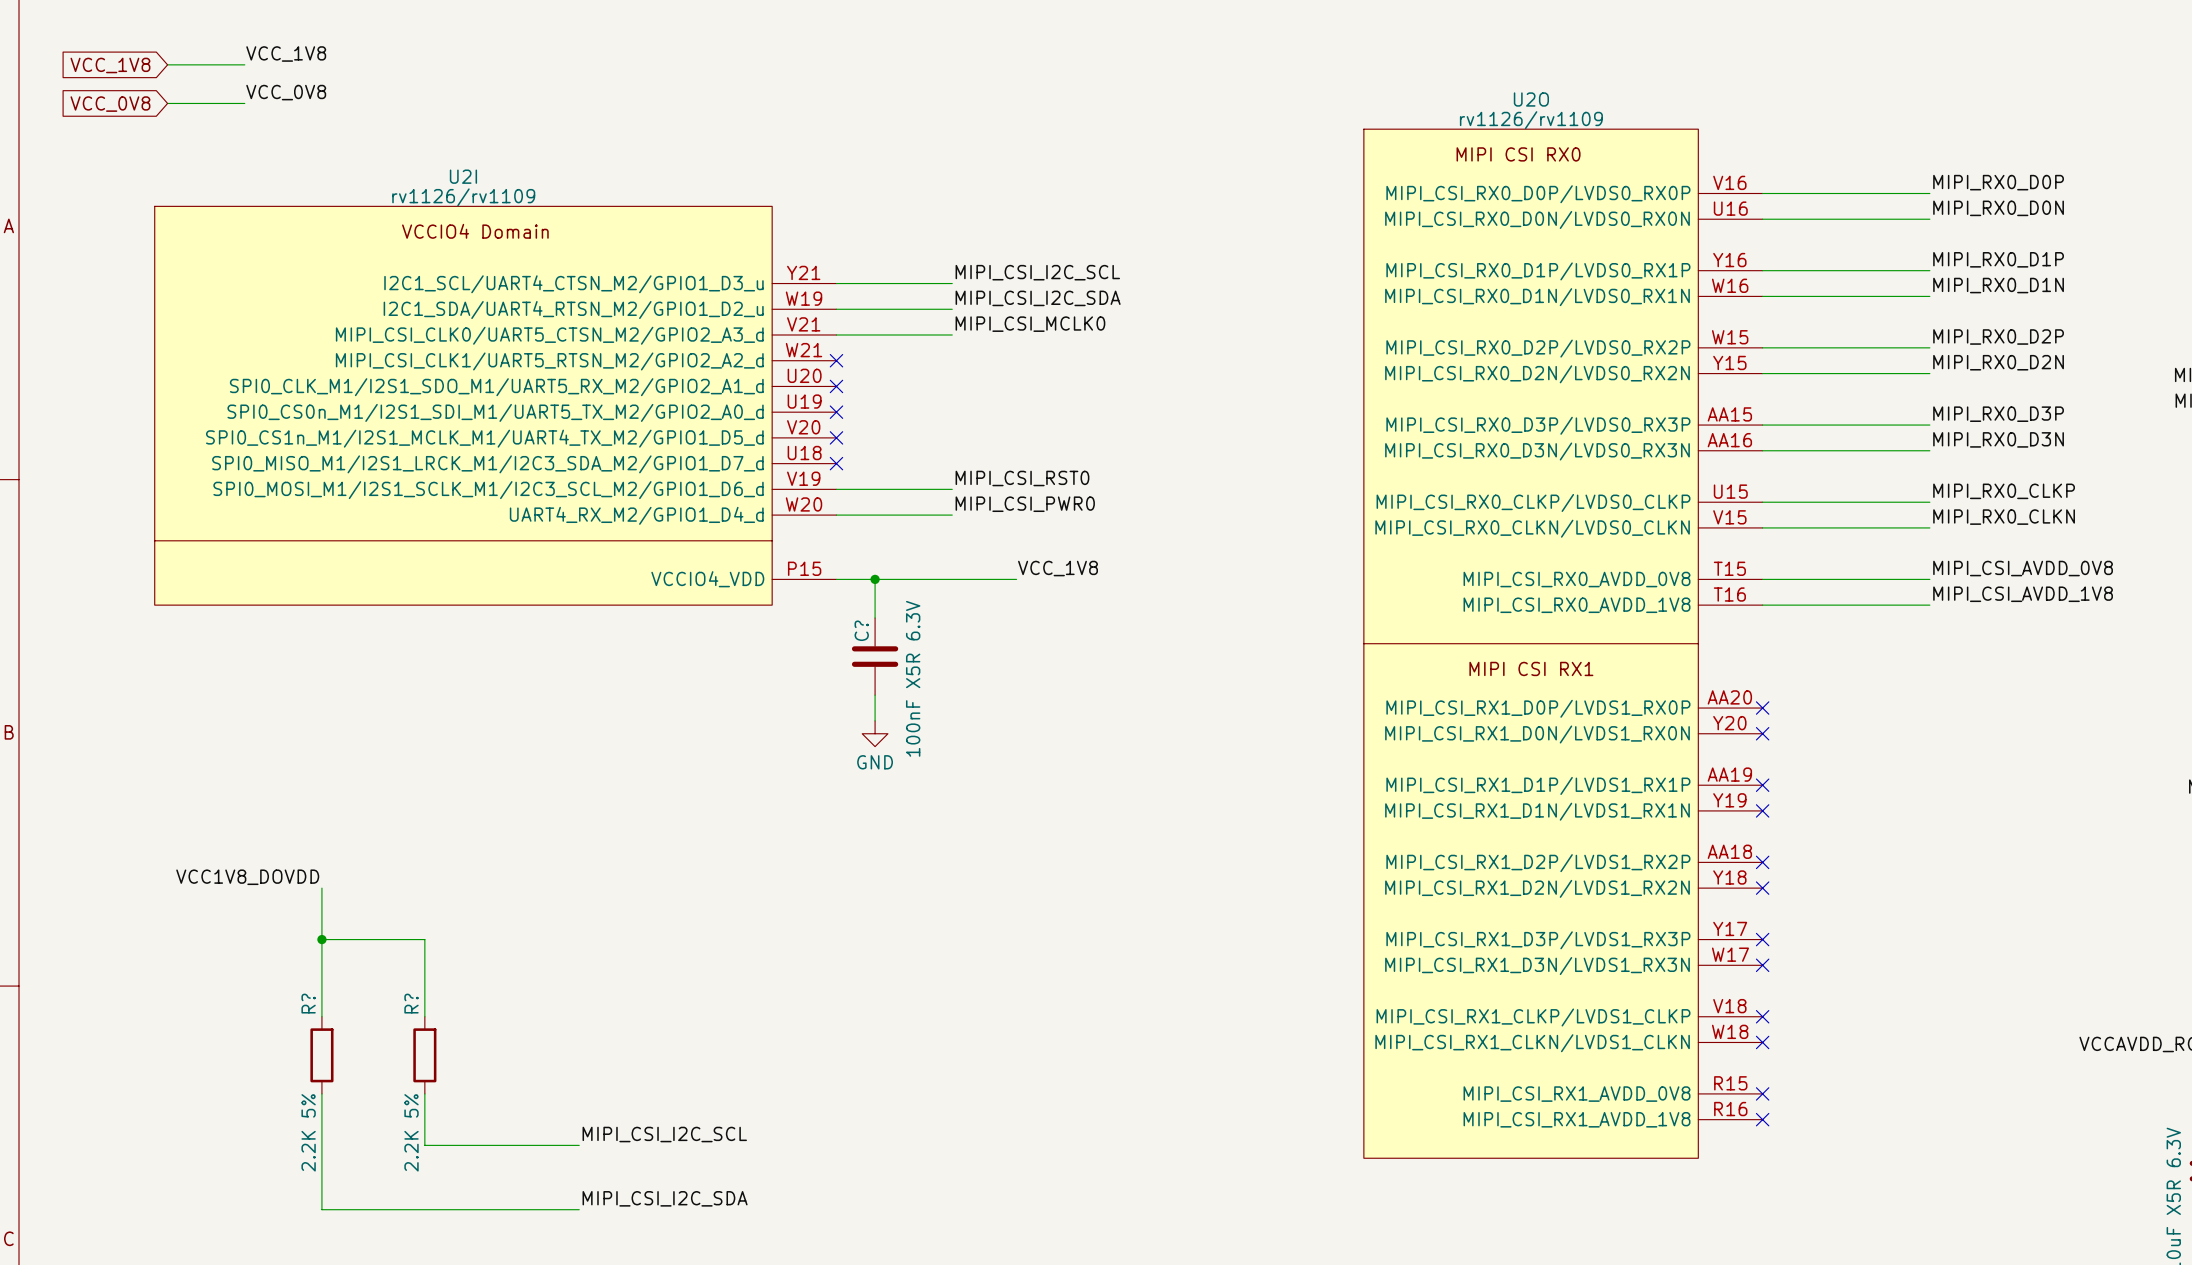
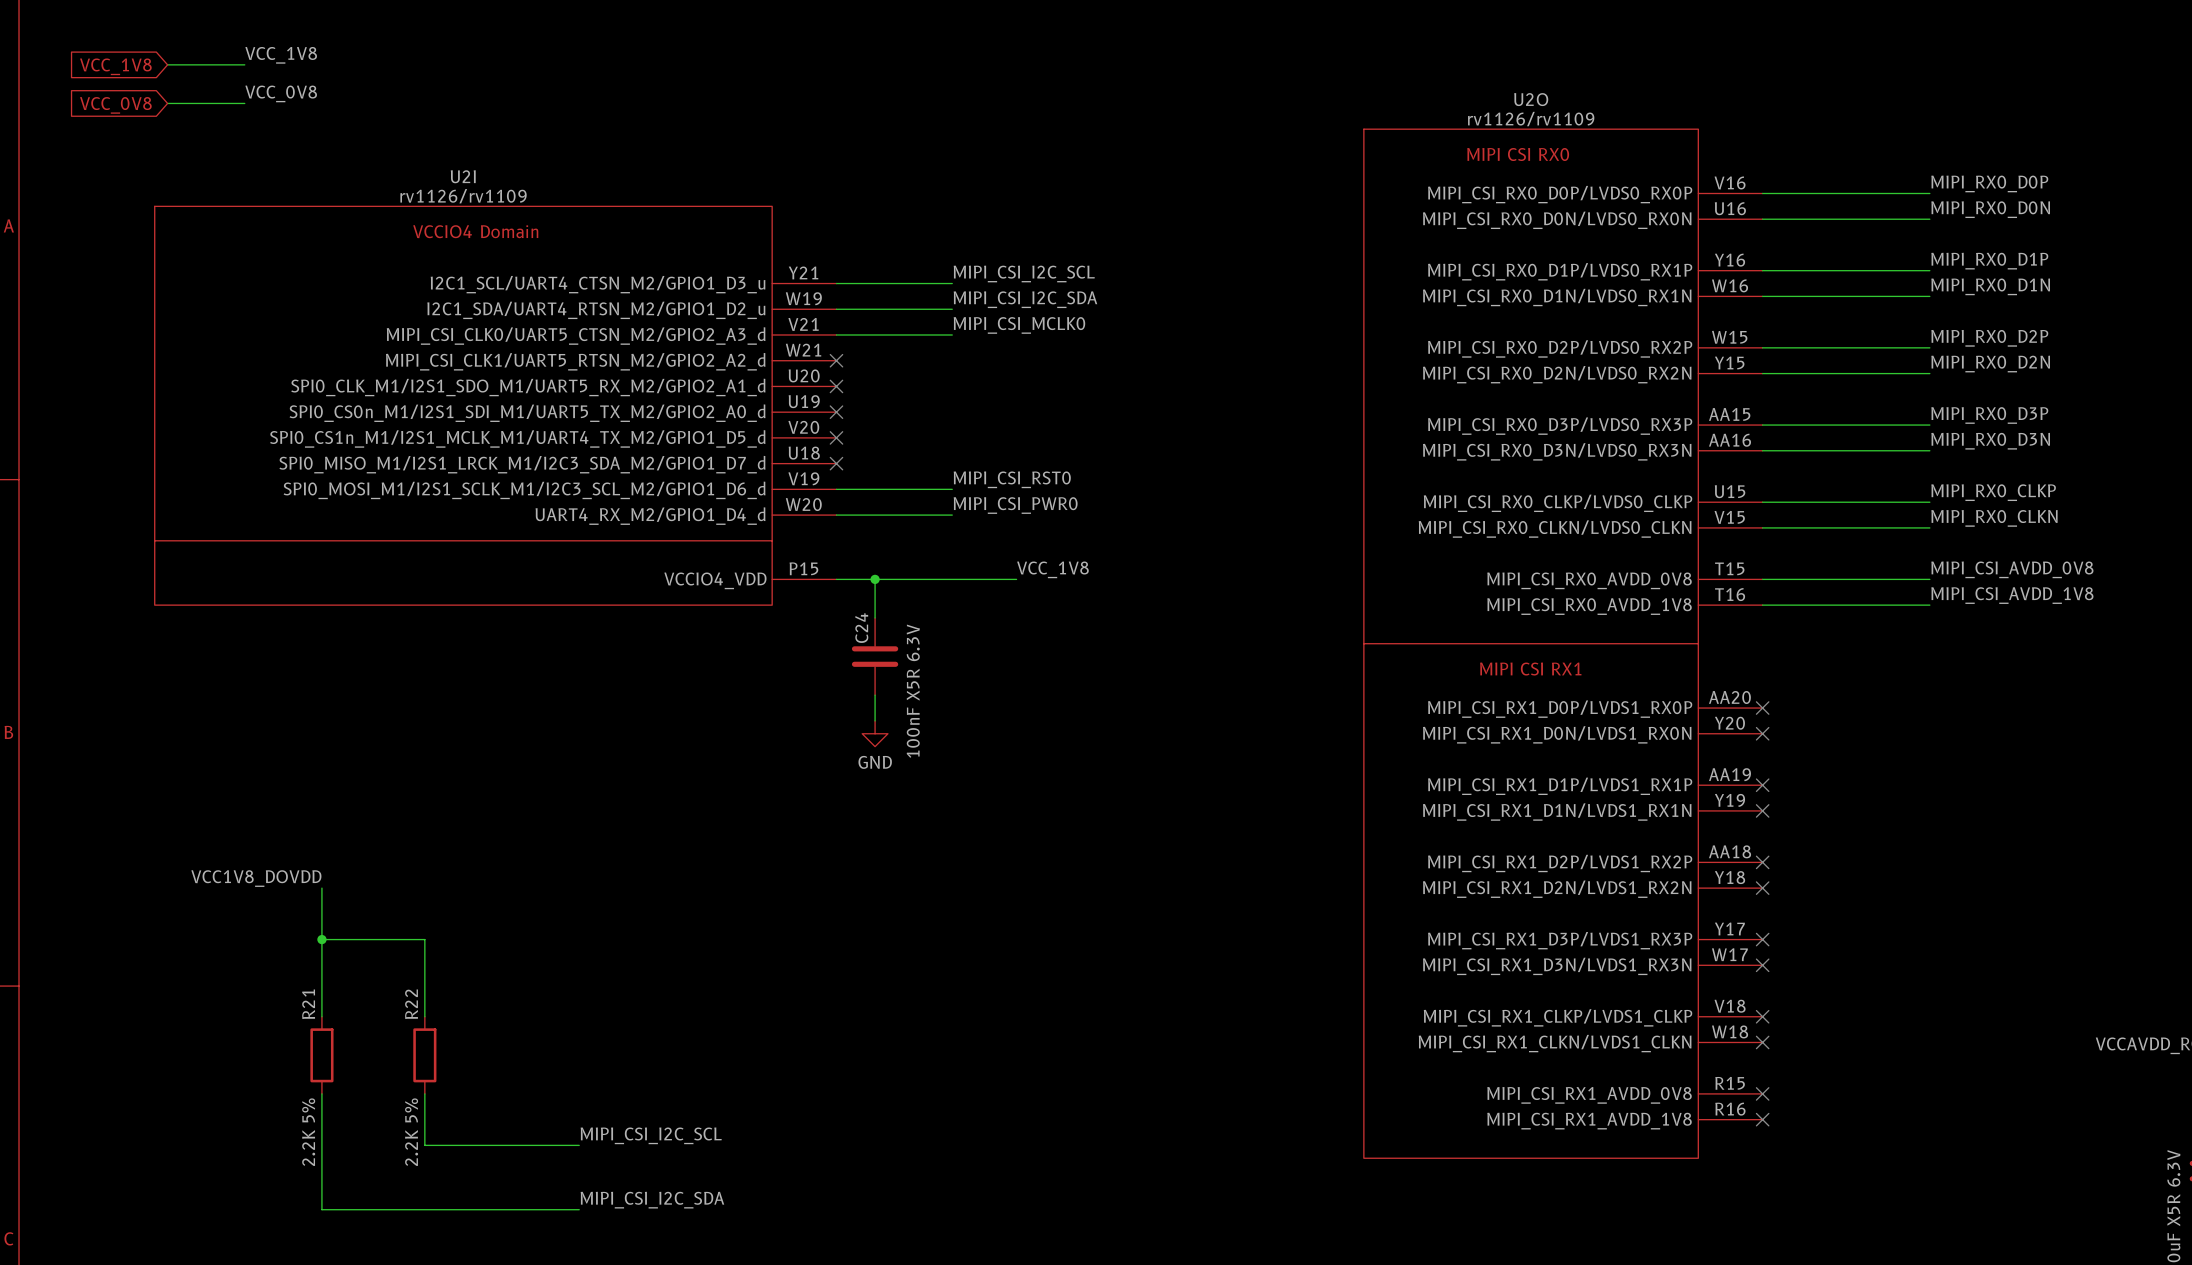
C? name: C? (861, 630) -> C24 (861, 628)
R? name: R? (308, 1003) -> R21 (308, 1004)
R? name: R? (411, 1003) -> R22 (411, 1004)

